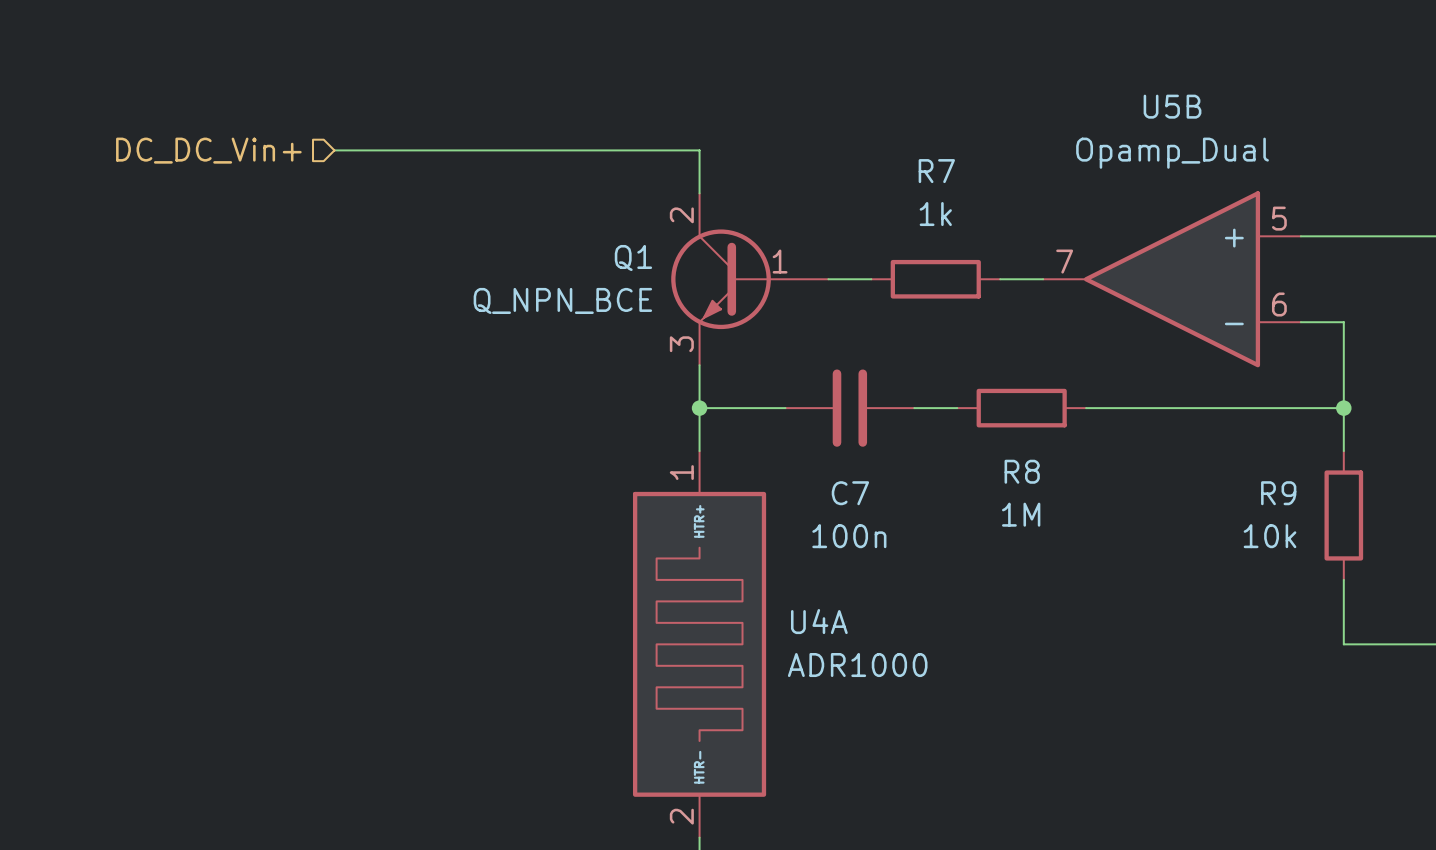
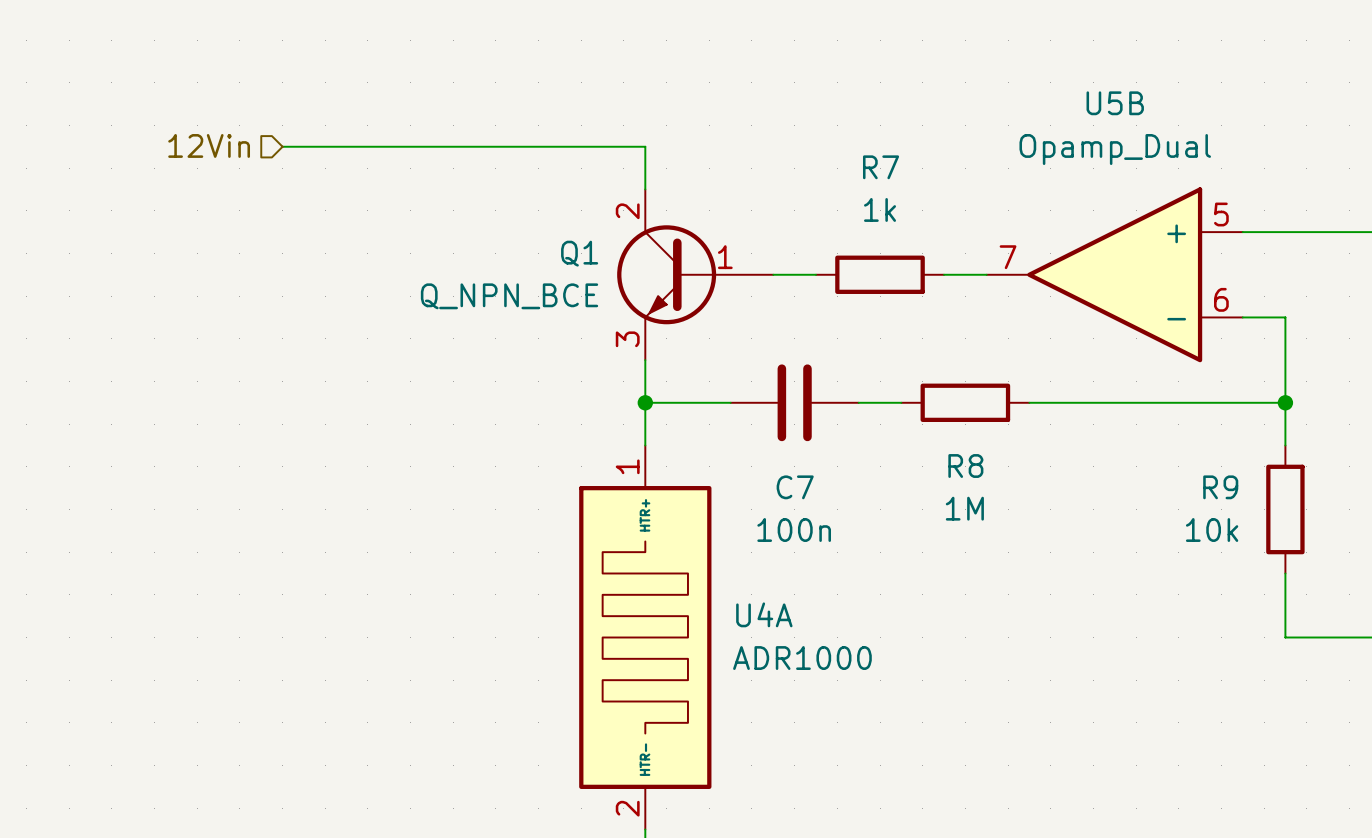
hierarchical label: DC_DC_Vin+ (208, 150) -> 12Vin (209, 145)

